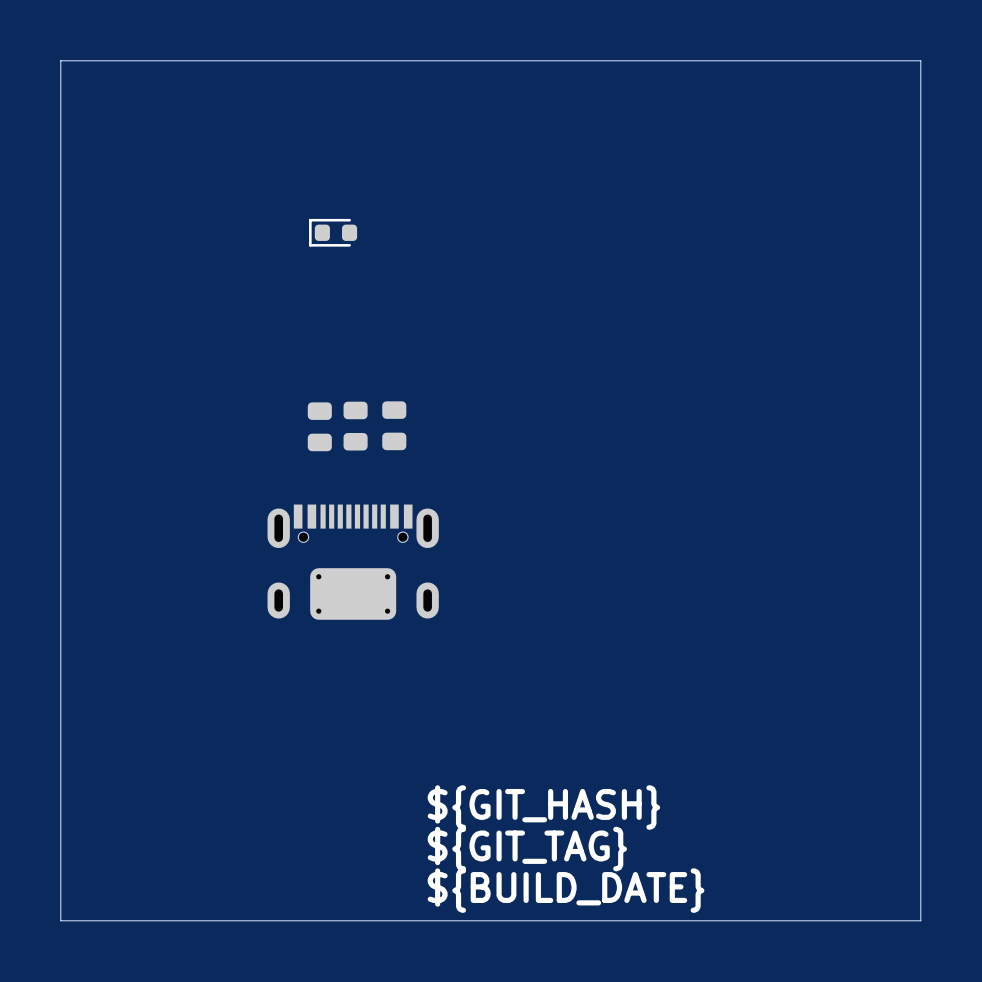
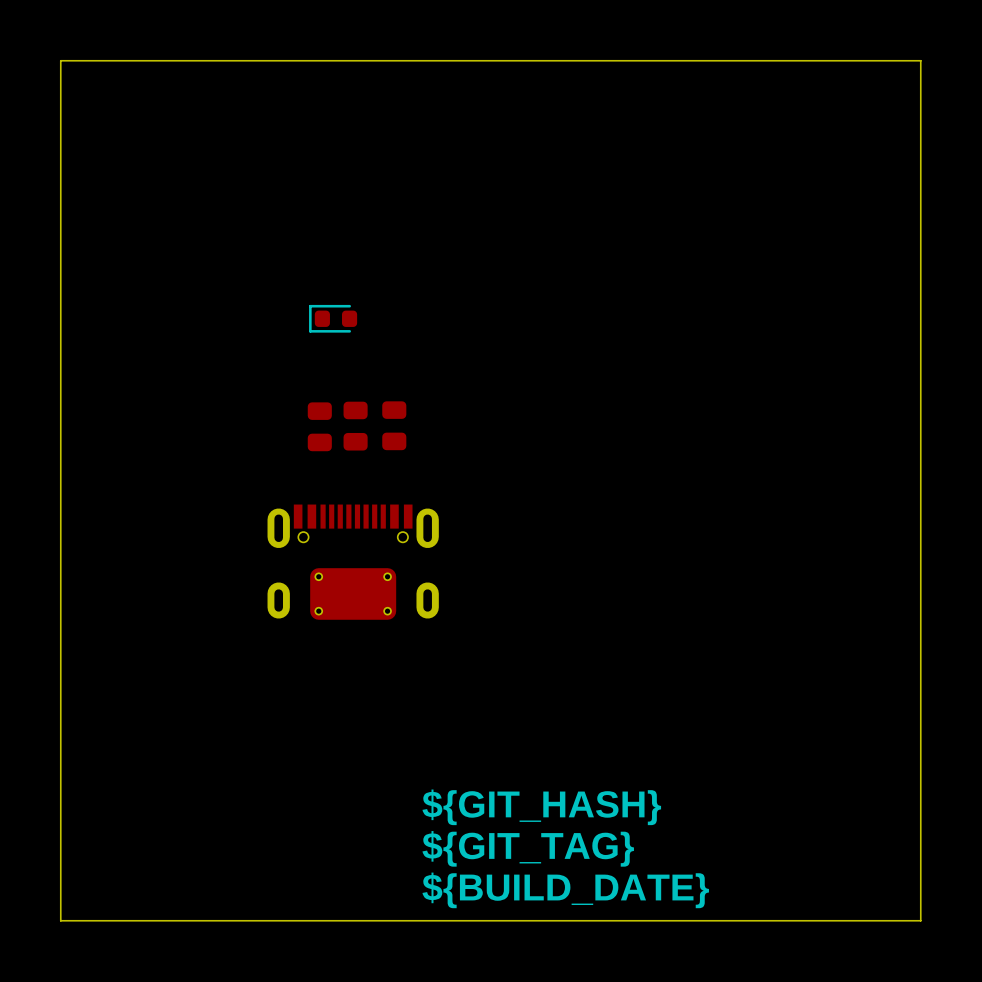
part position: (333, 232) -> (333, 318)

